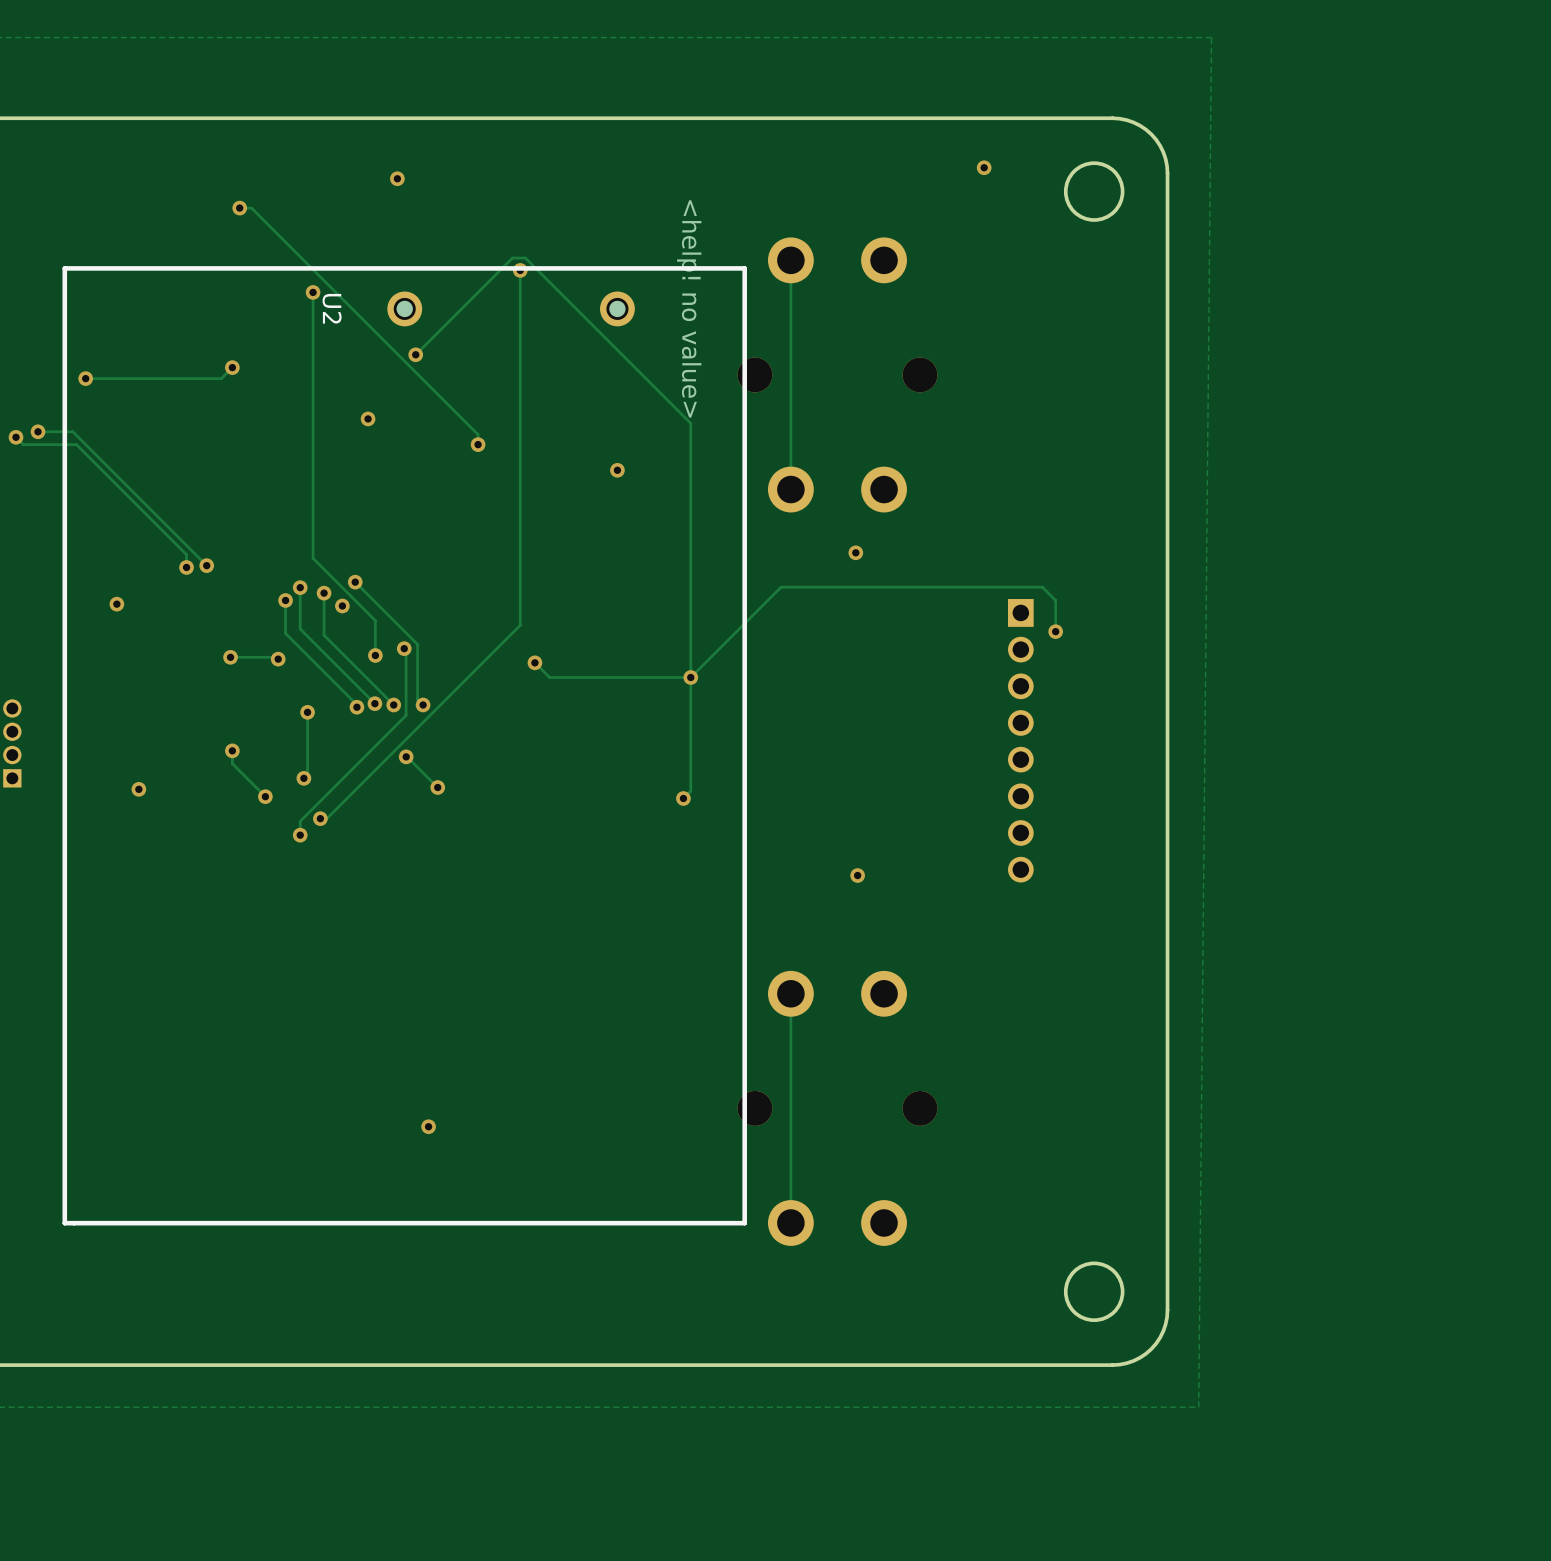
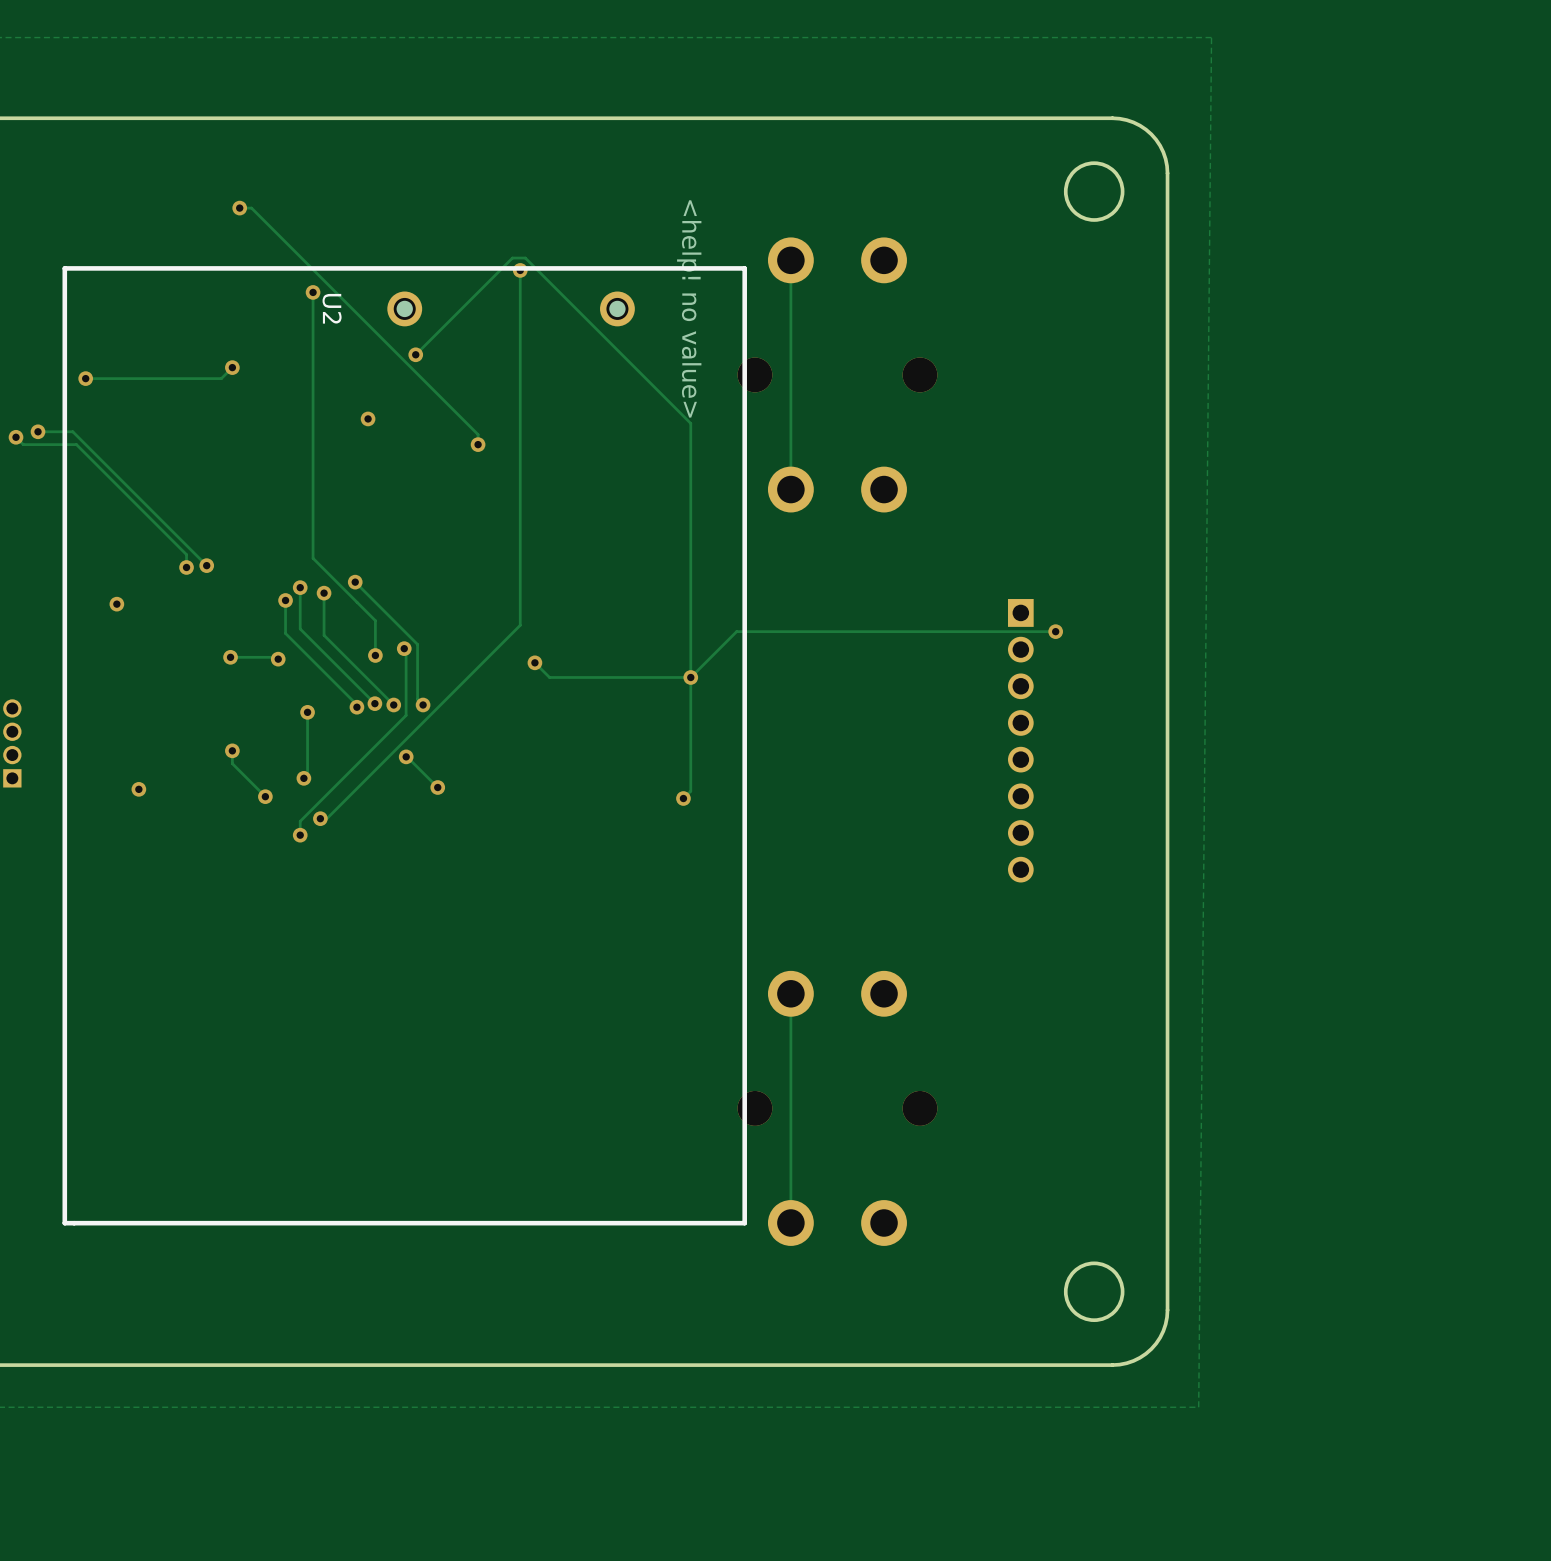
via: (984, 167) -> none
via: (397, 178) -> none
via: (617, 470) -> none
via: (855, 552) -> none
via: (342, 605) -> none
track: (1055, 631) (1055, 600) (1042, 587) (781, 587) (736, 631) -> (1055, 631) (736, 631)
via: (857, 875) -> none
via: (428, 1126) -> none

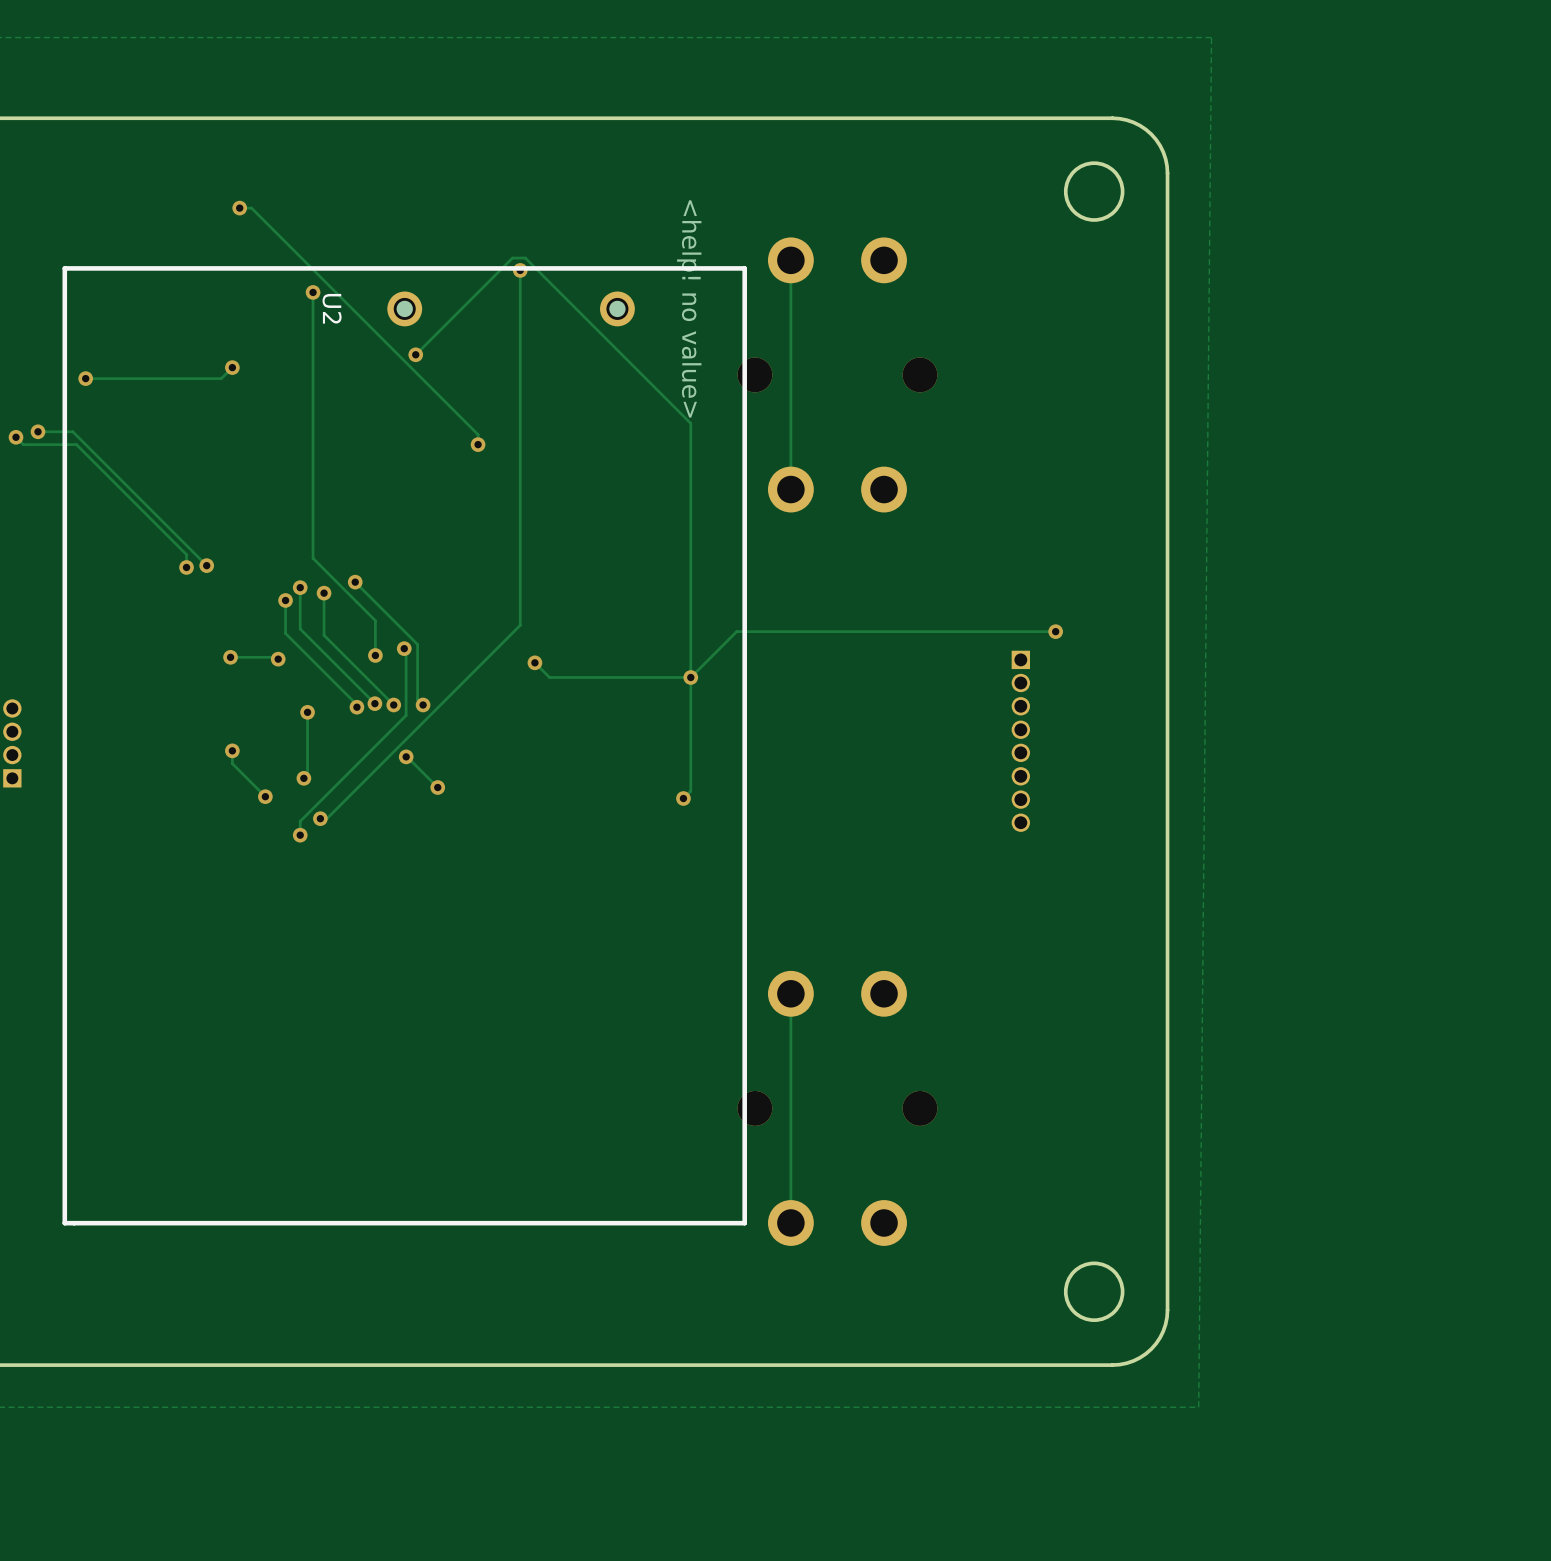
via: (368, 418) -> none
part footprint: [1008, 599, 1034, 883] -> [1011, 650, 1031, 832]
via: (116, 604) -> none
via: (138, 789) -> none

